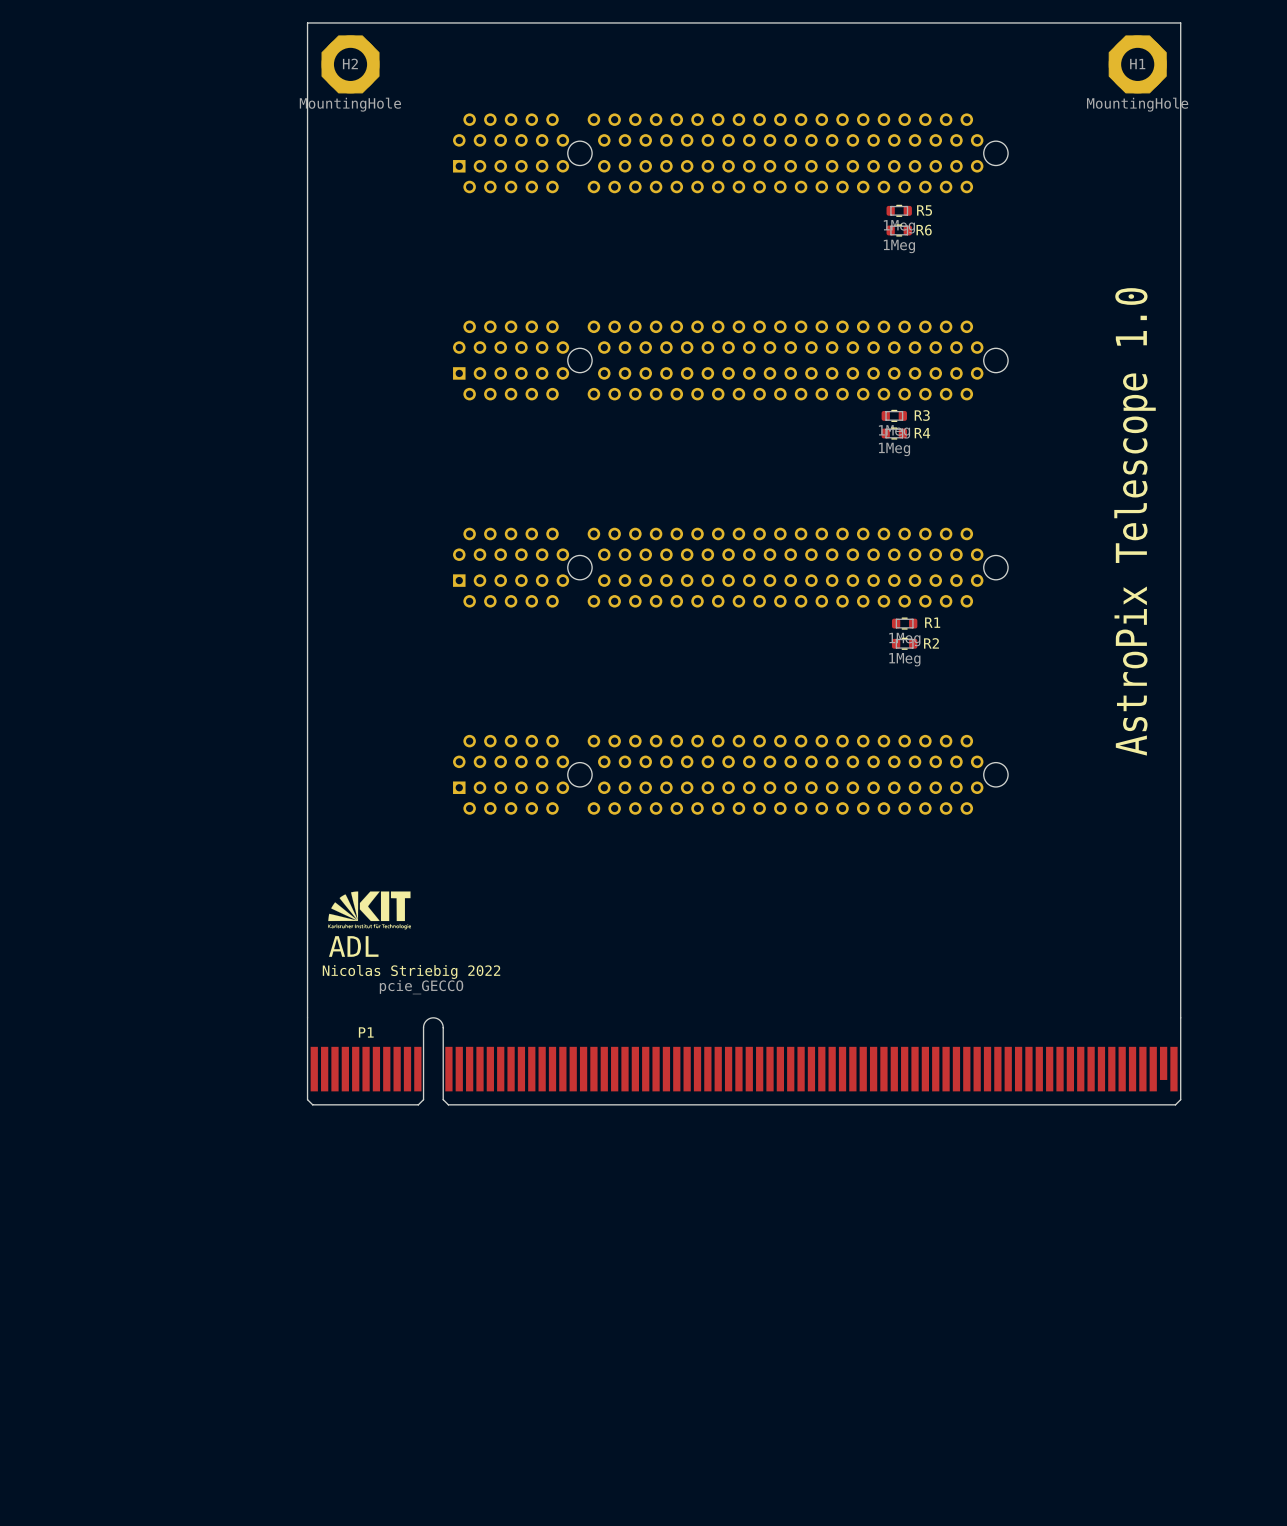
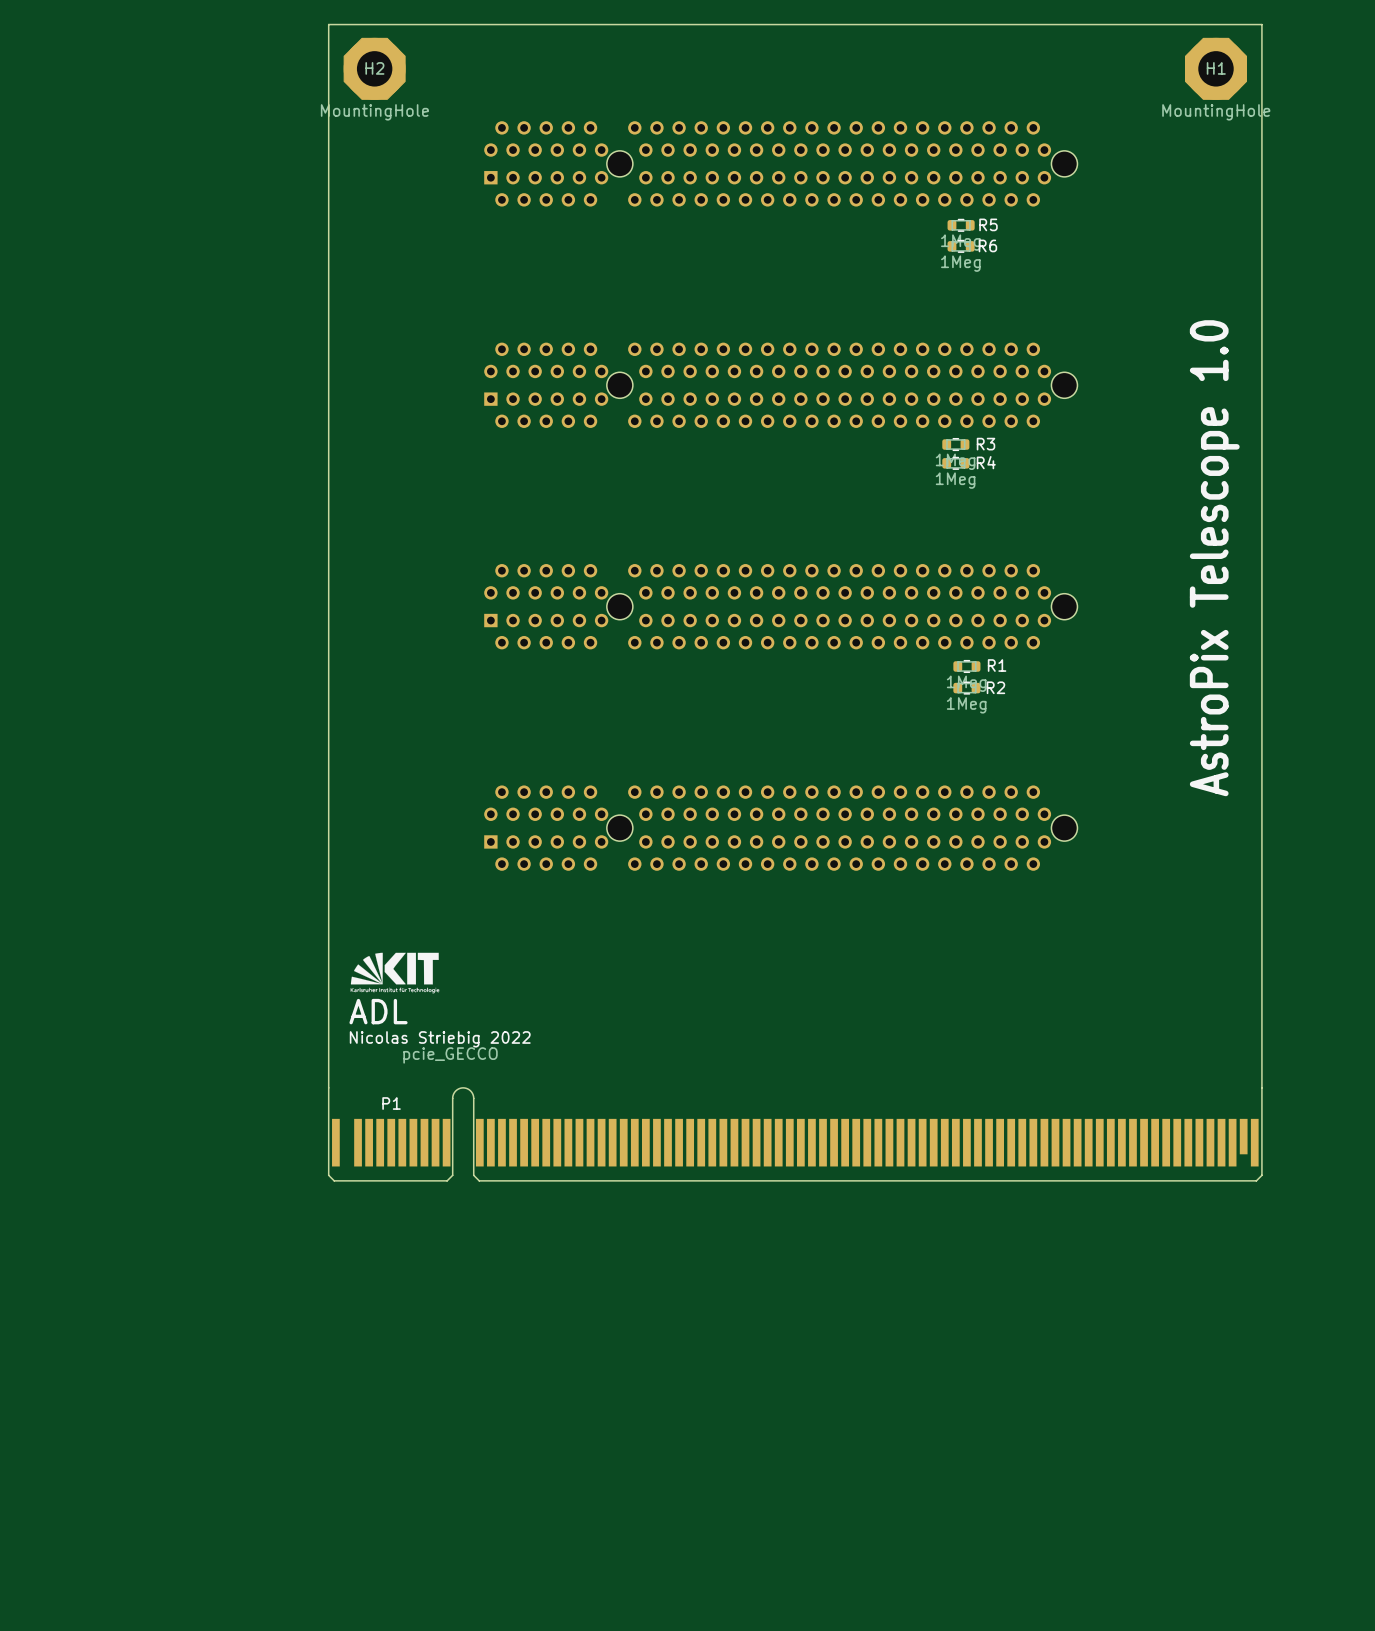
P1 footprint: [307, 1017, 1182, 1106] -> [328, 1087, 1263, 1182]

